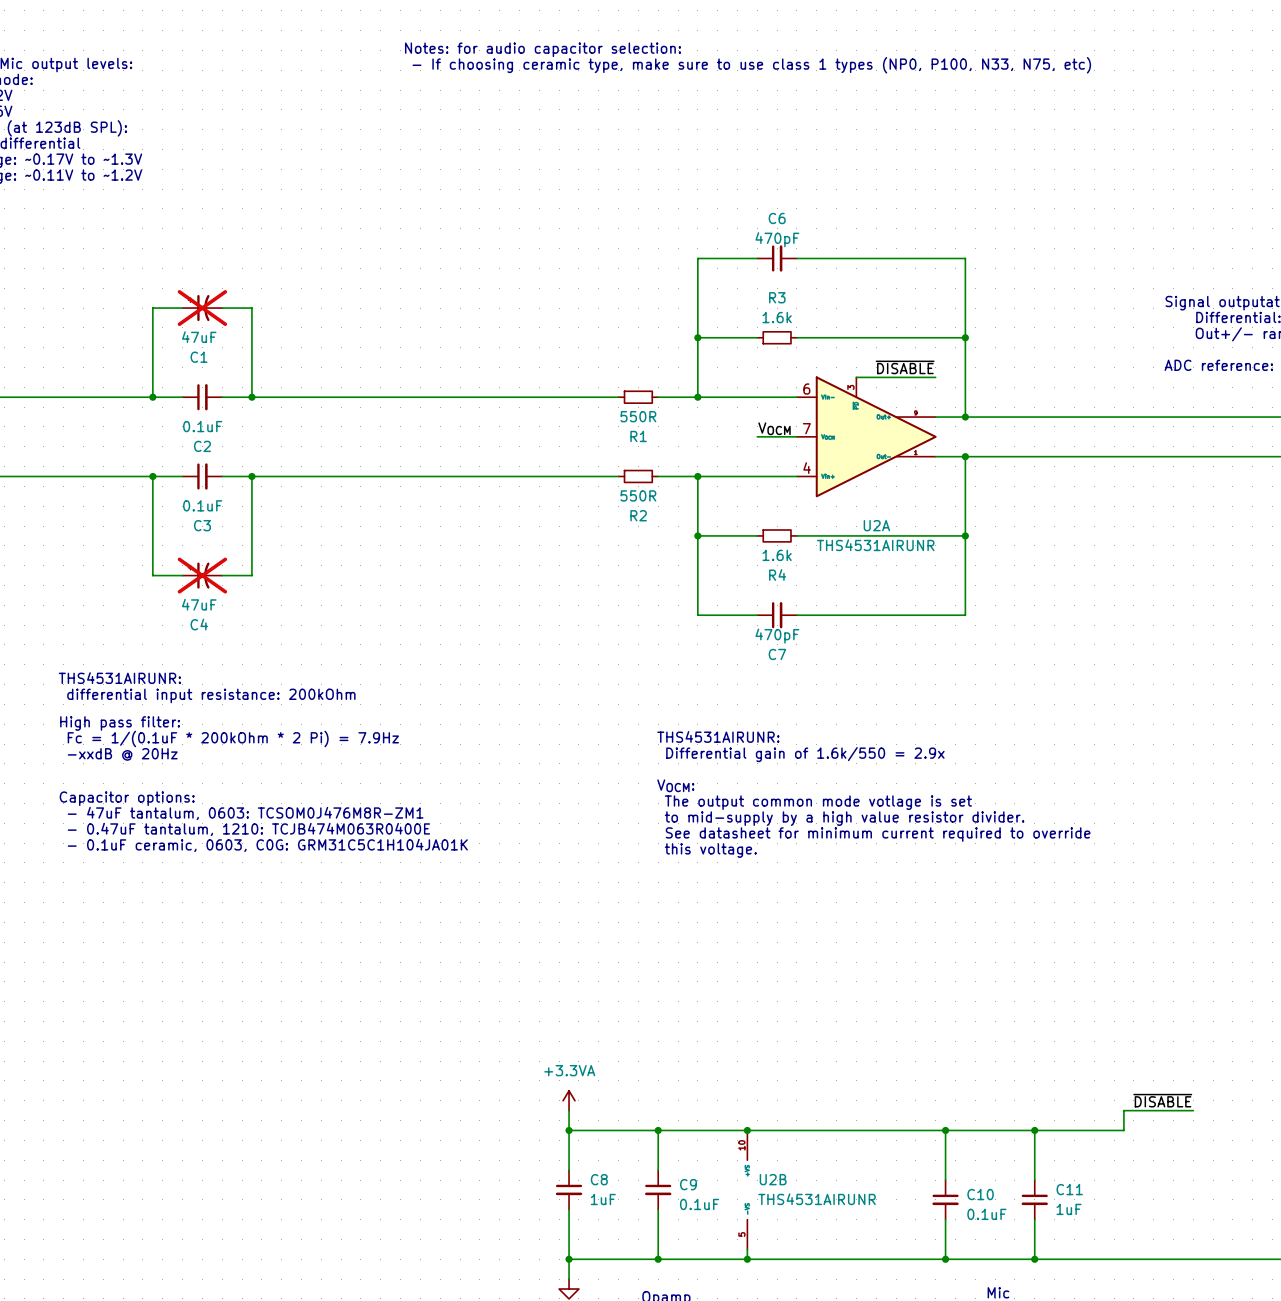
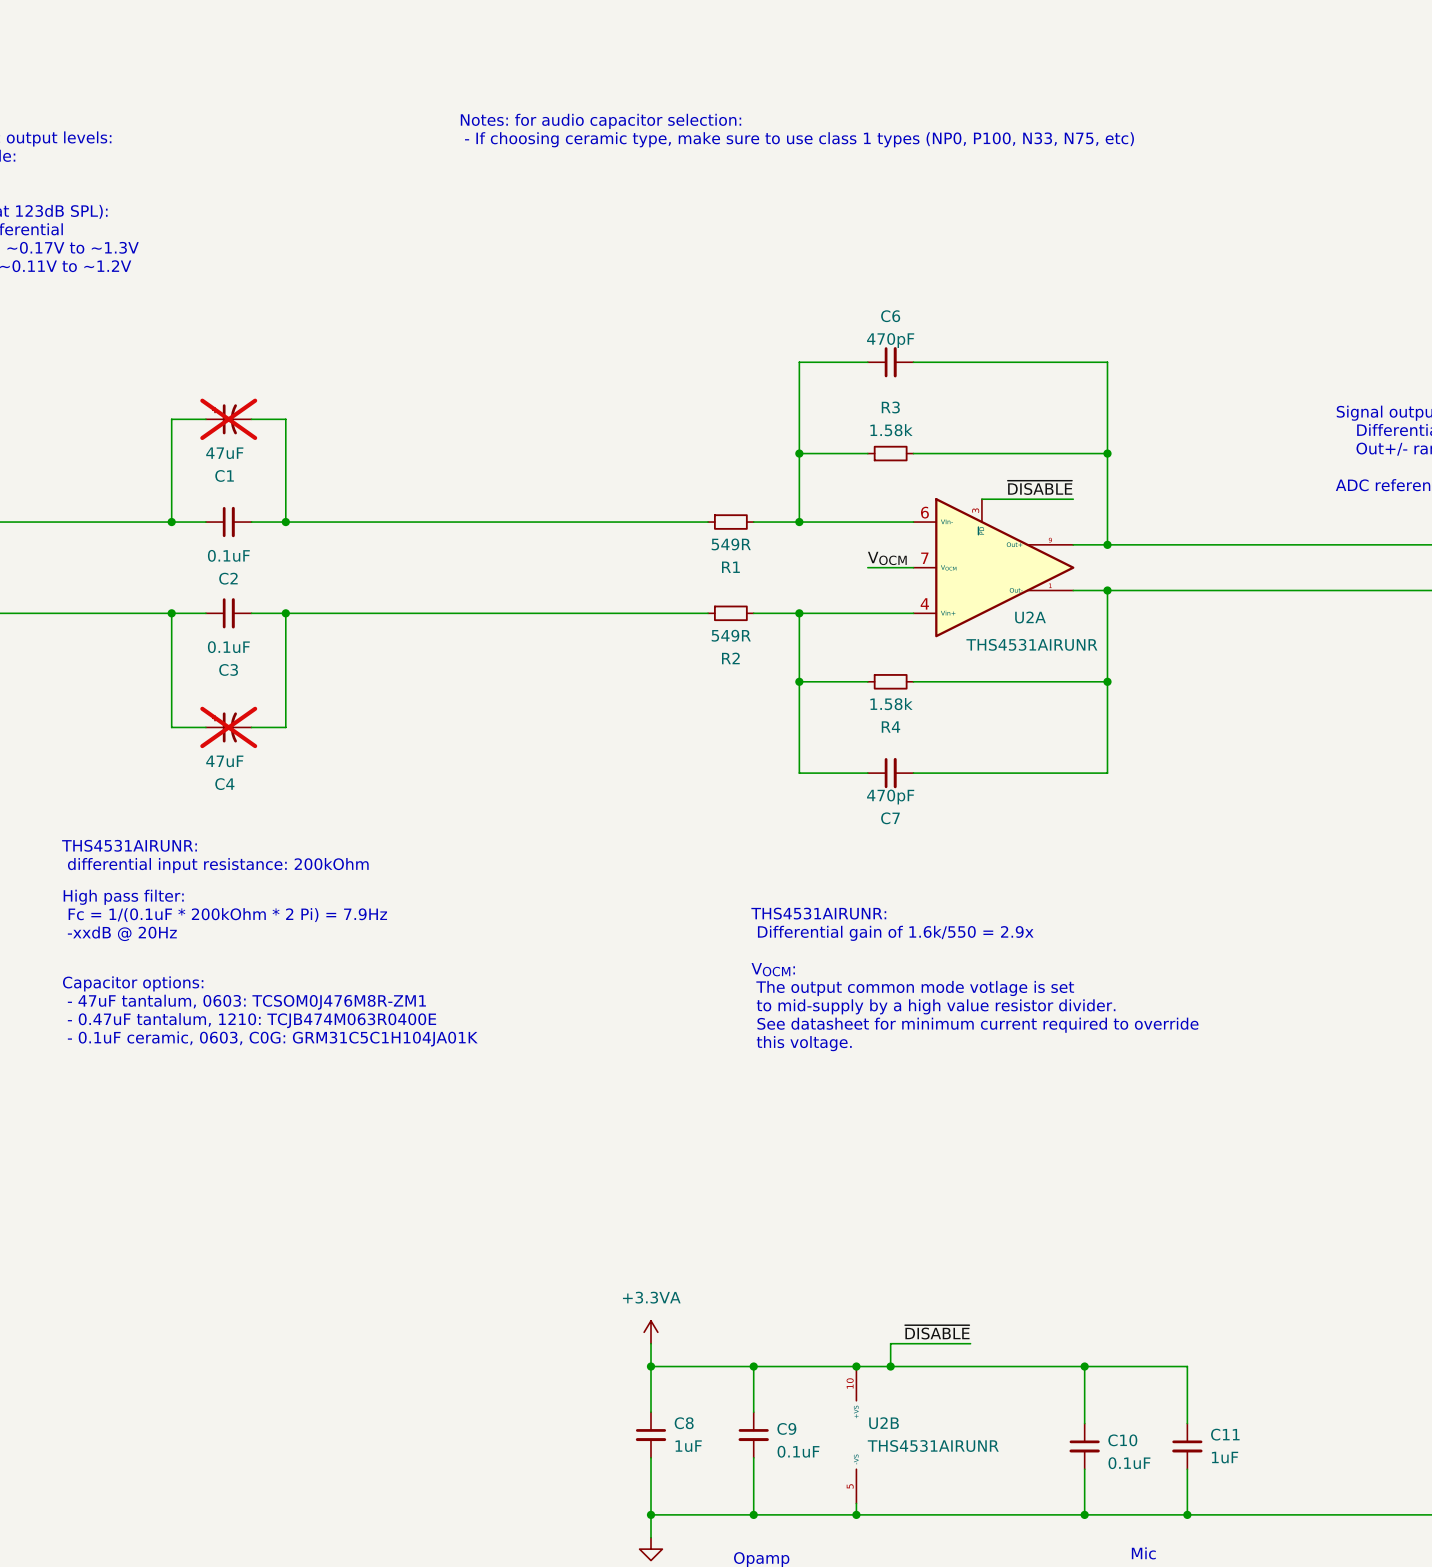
R3 value: 1.6k (777, 317) -> 1.58k (891, 430)
R1 value: 550R (638, 416) -> 549R (731, 544)
R2 value: 550R (638, 495) -> 549R (731, 635)
U2A name position: U2A (876, 525) -> U2A (1030, 617)
U2A value position: THS4531AIRUNR (875, 545) -> THS4531AIRUNR (1031, 644)
R4 value: 1.6k (777, 555) -> 1.58k (891, 704)
label: none -> ~{DISABLE} (937, 1332)
label: ~{DISABLE} (1162, 1100) -> none
wire: none -> (970, 1343) (890, 1343) (890, 1366)
wire: (1193, 1110) (1123, 1110) (1123, 1130) (1034, 1130) -> none
junction: none -> (890, 1366)
junction: (1034, 1130) -> none

